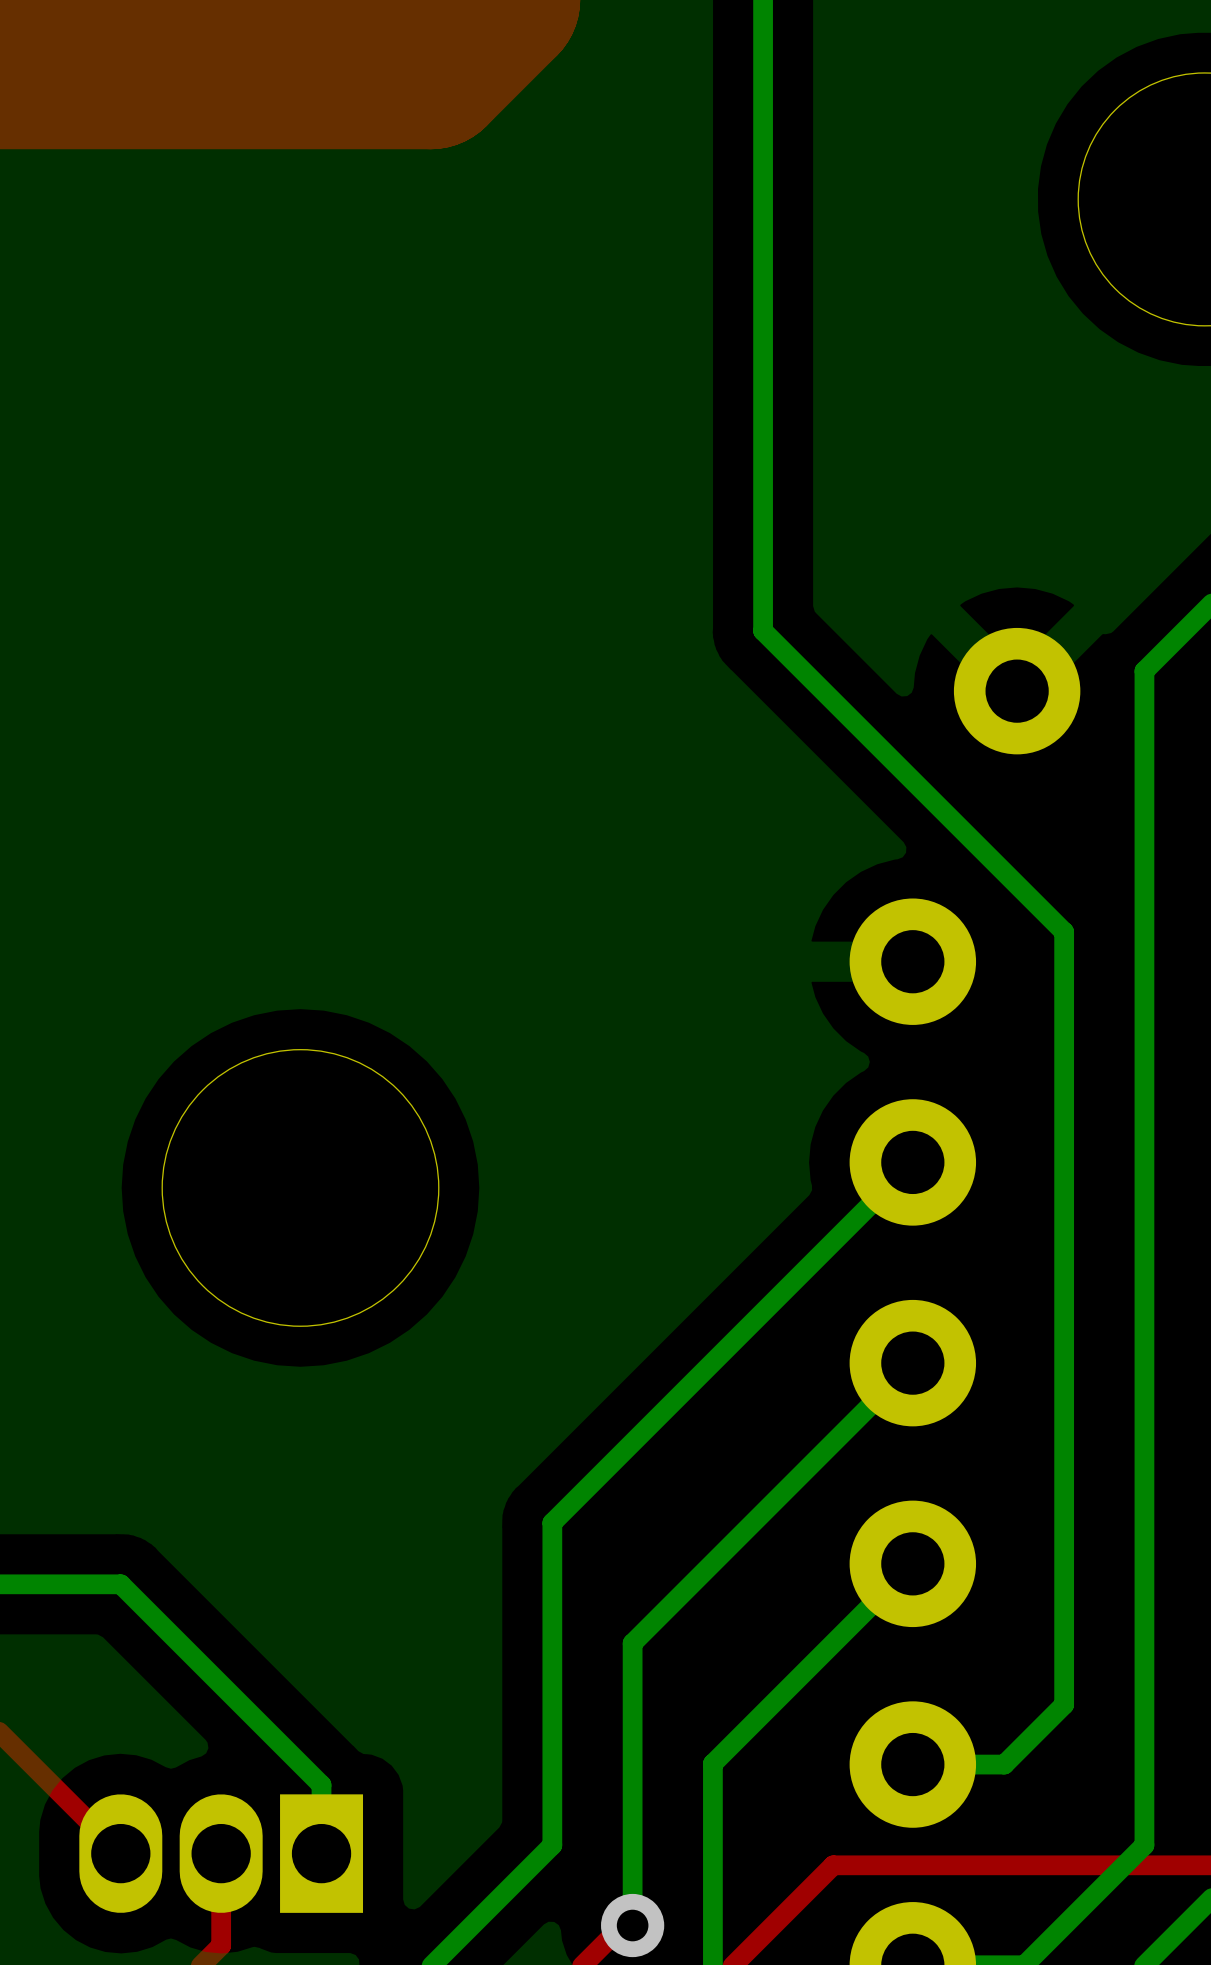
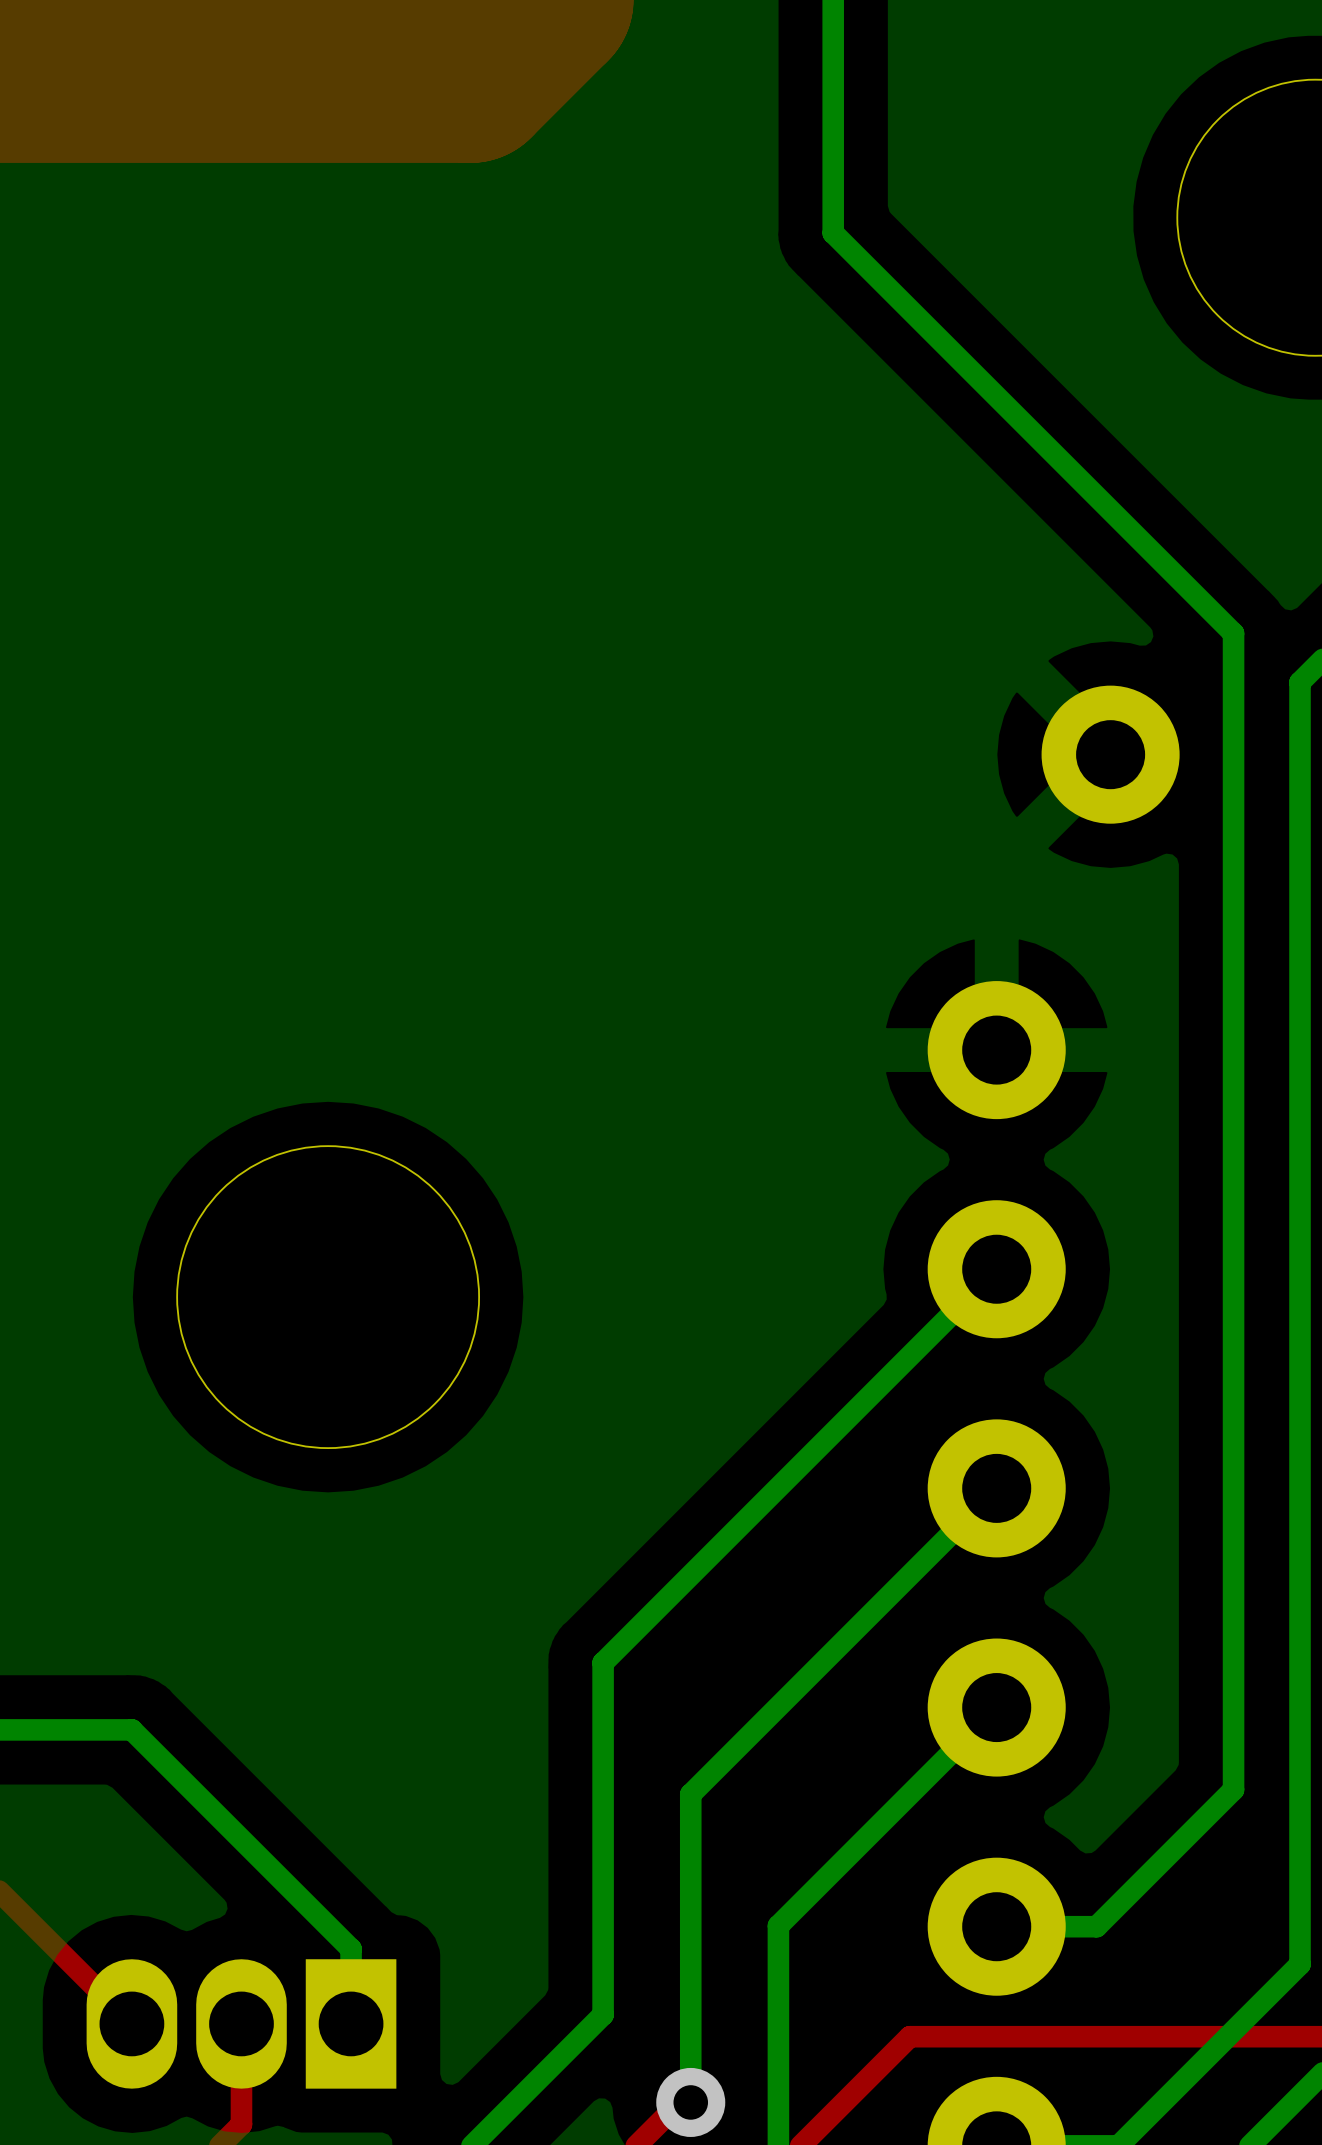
bottom track: (763, 213) (763, 630) (1064, 932) (1064, 1704) -> (833, 233) (1233, 633) (1233, 1789) (1161, 1861)
bottom track: (1190, 624) (1144, 671) (1144, 1845) -> (1300, 682) (1300, 1964) (1249, 2014)

